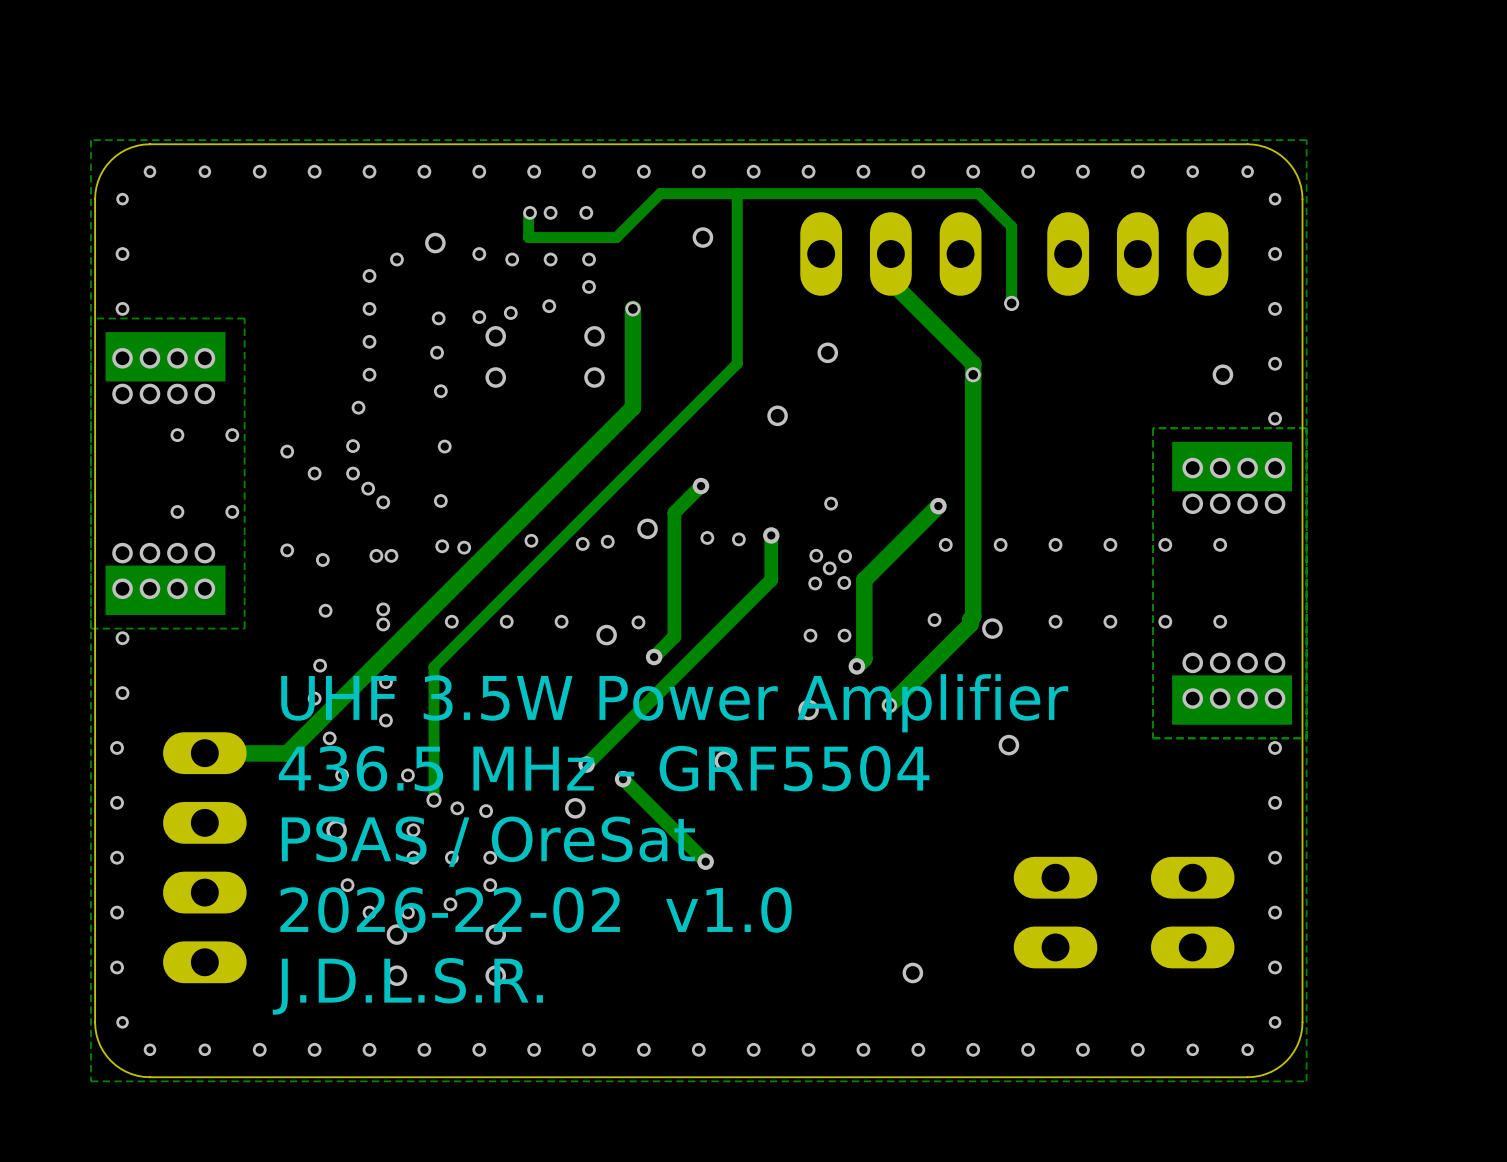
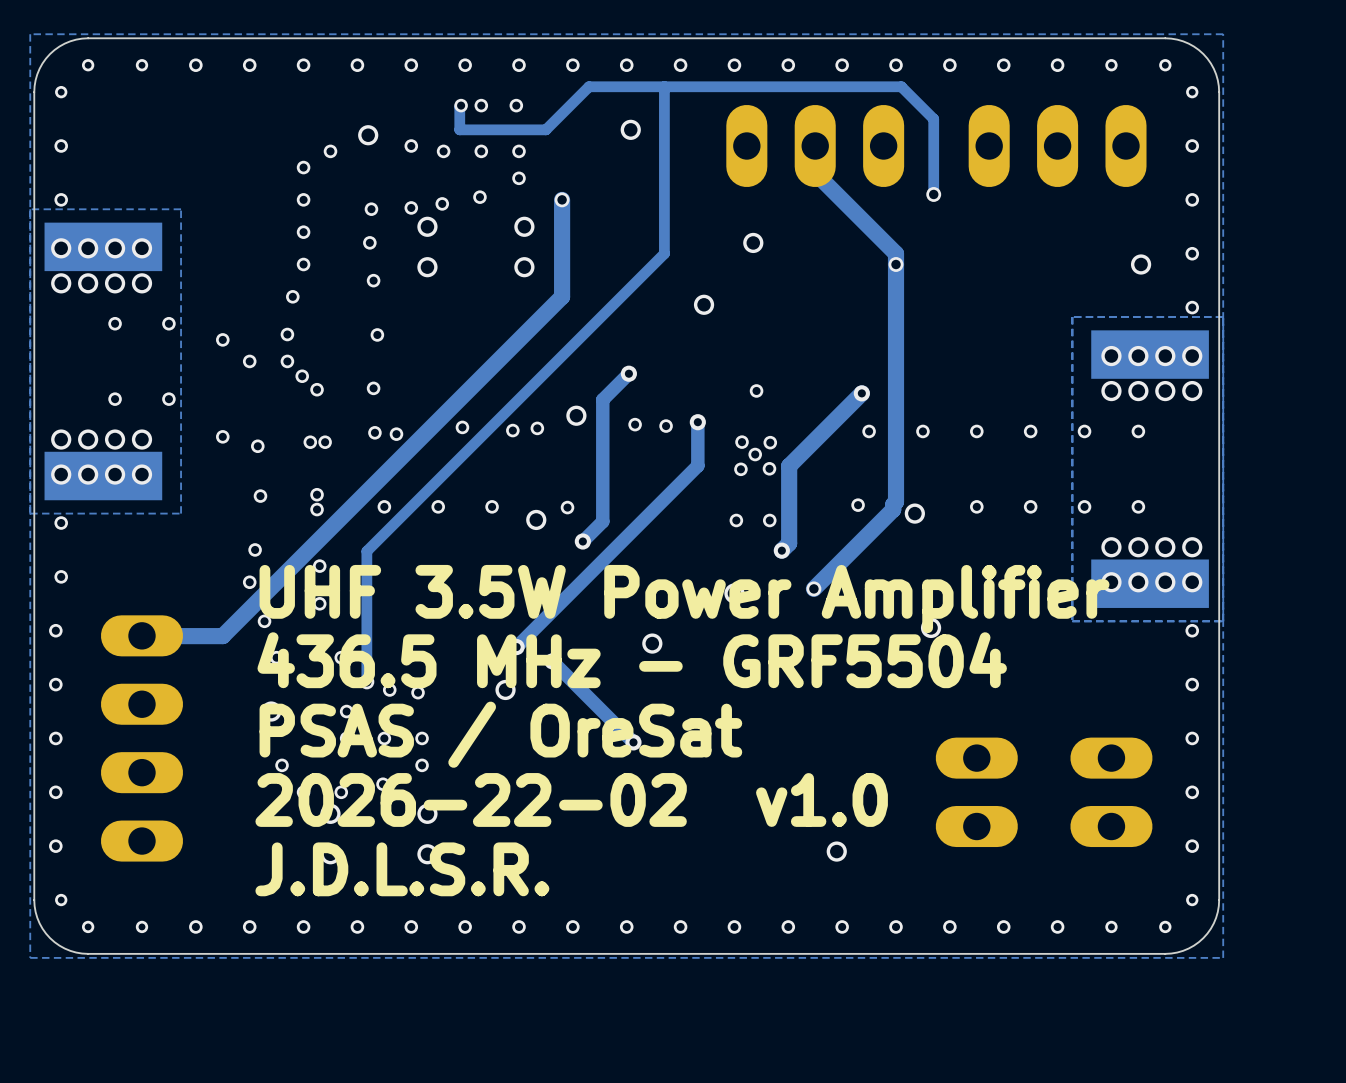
text position: UHF 3.5W Power Amplifier (674, 703) -> UHF 3.5W Power Amplifier (684, 599)
text position: 436.5 MHz - GRF5504 (604, 768) -> 436.5 MHz - GRF5504 (632, 660)
text position: PSAS / OreSat (488, 841) -> PSAS / OreSat (500, 734)
text position: 2026-22-02 v1.0 (536, 910) -> 2026-22-02 v1.0 (571, 799)
text position: J.D.L.S.R. (407, 986) -> J.D.L.S.R. (402, 869)

